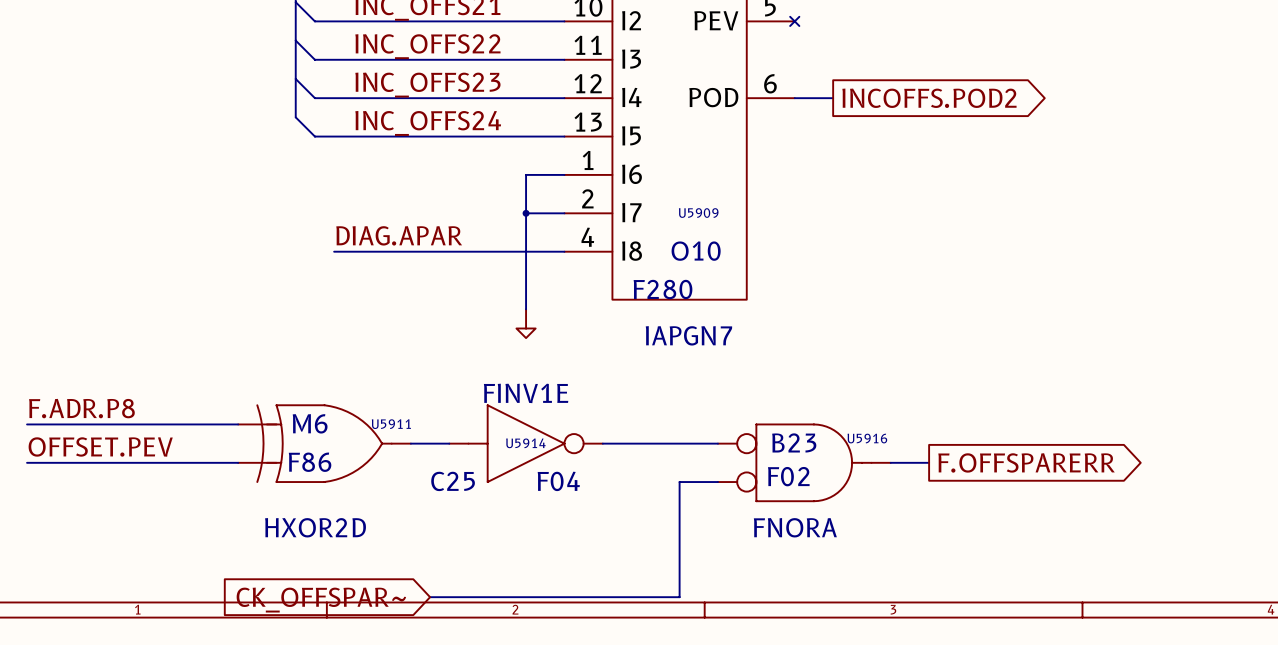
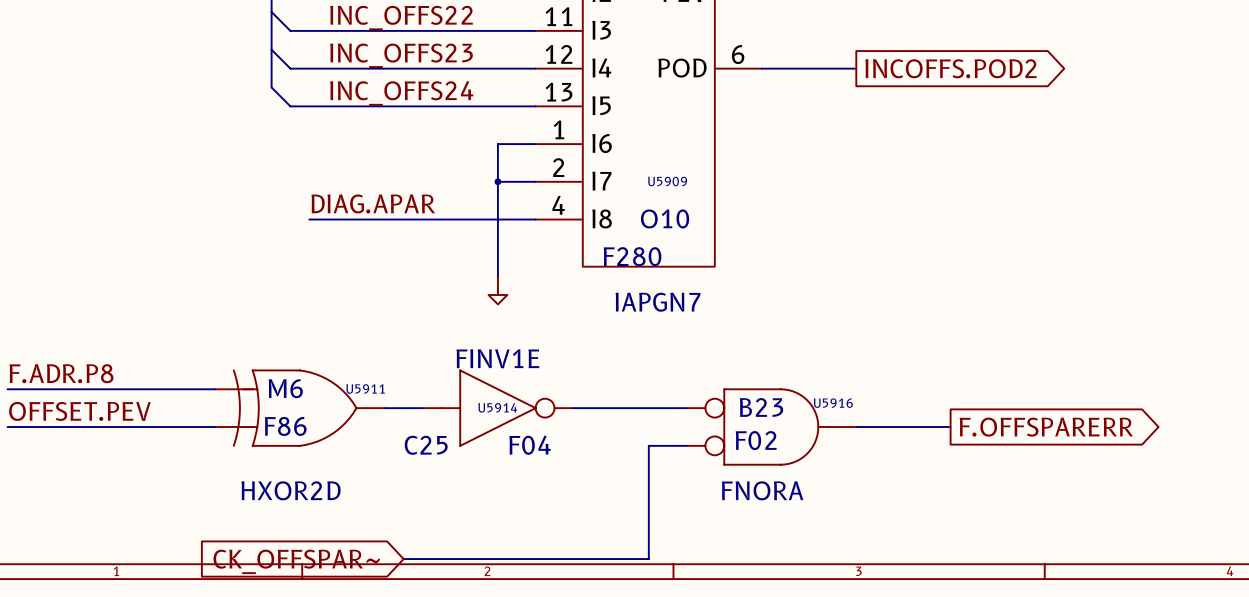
wire: none -> (799, 68) (856, 68)
global label position: INCOFFS.POD2 (929, 98) -> INCOFFS.POD2 (950, 68)
wire: none -> (894, 427) (950, 427)
global label position: F.OFFSPARERR (1026, 462) -> F.OFFSPARERR (1046, 427)

